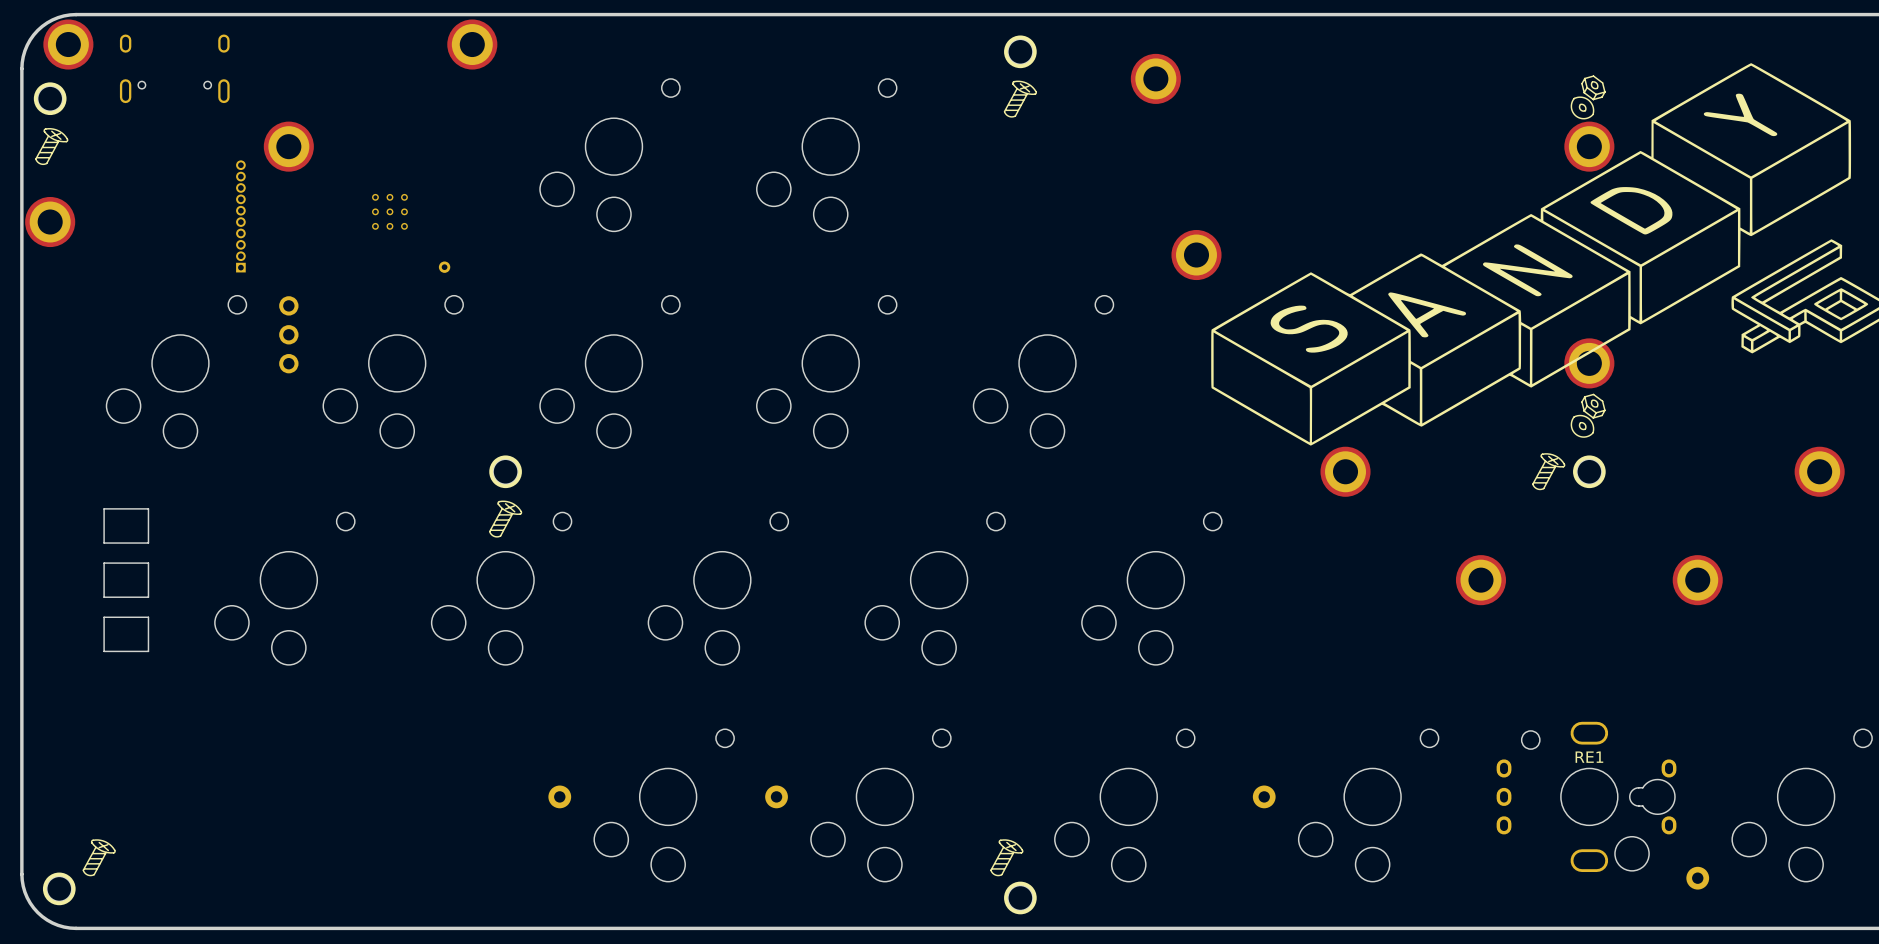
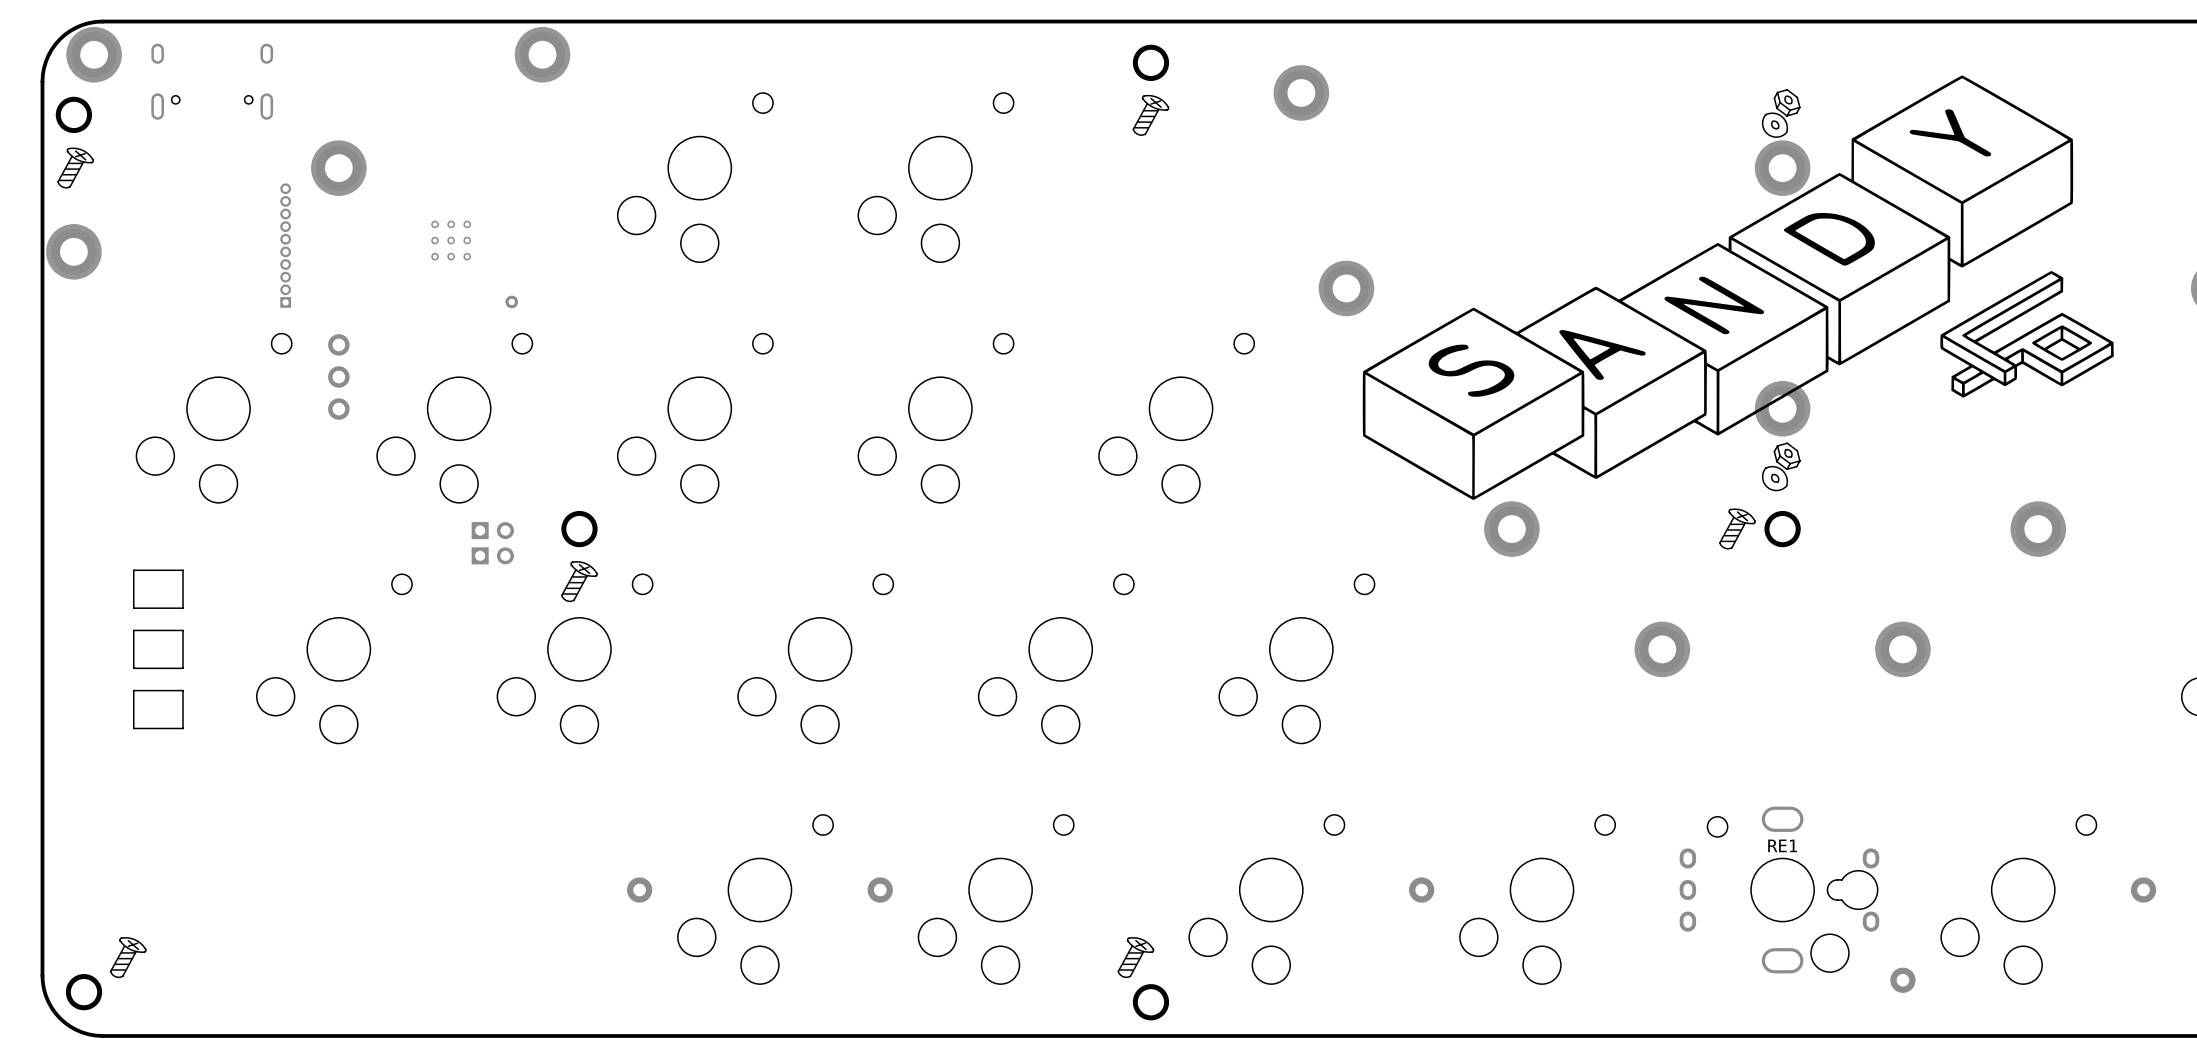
part: none -> (492, 543)

